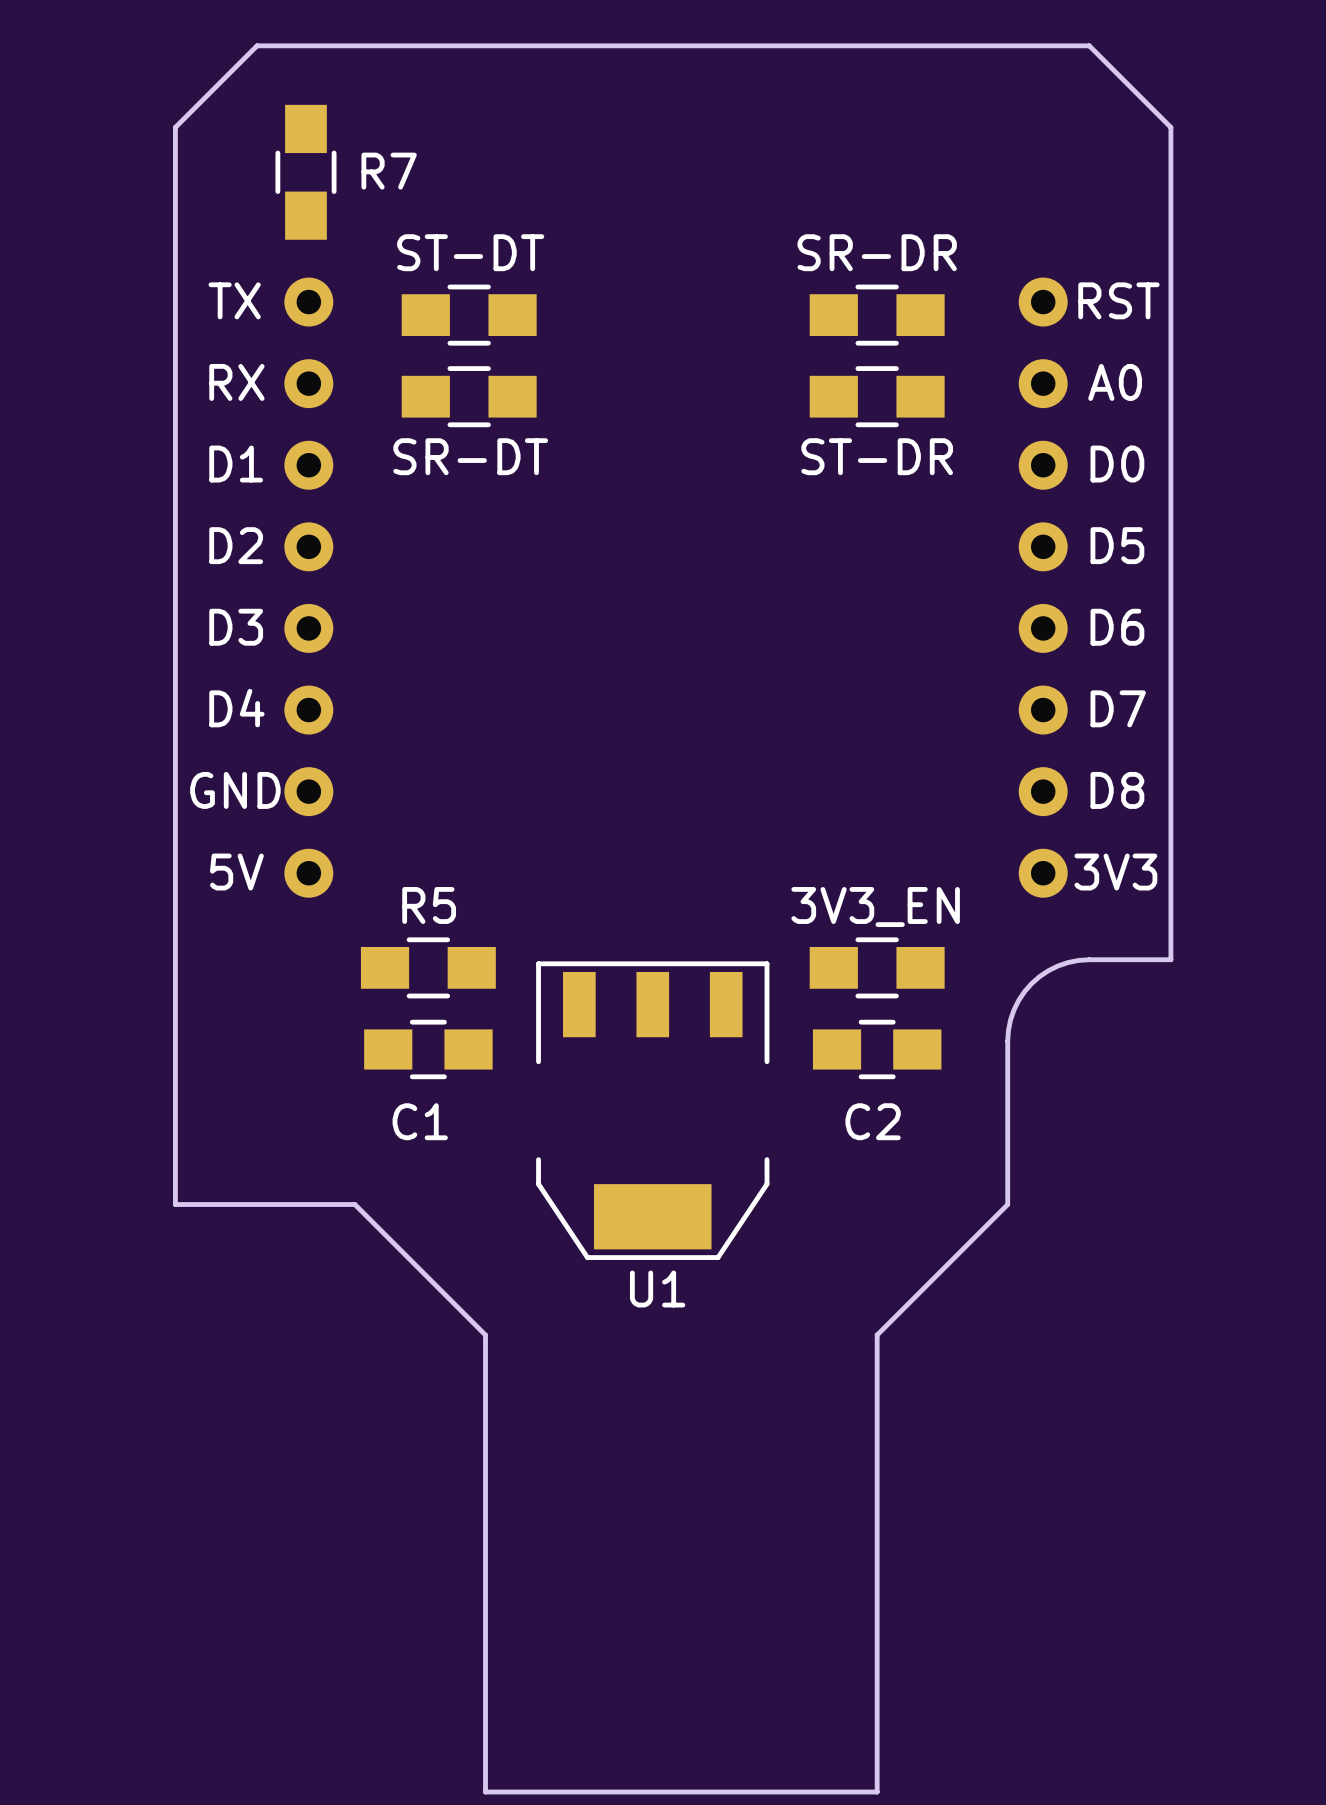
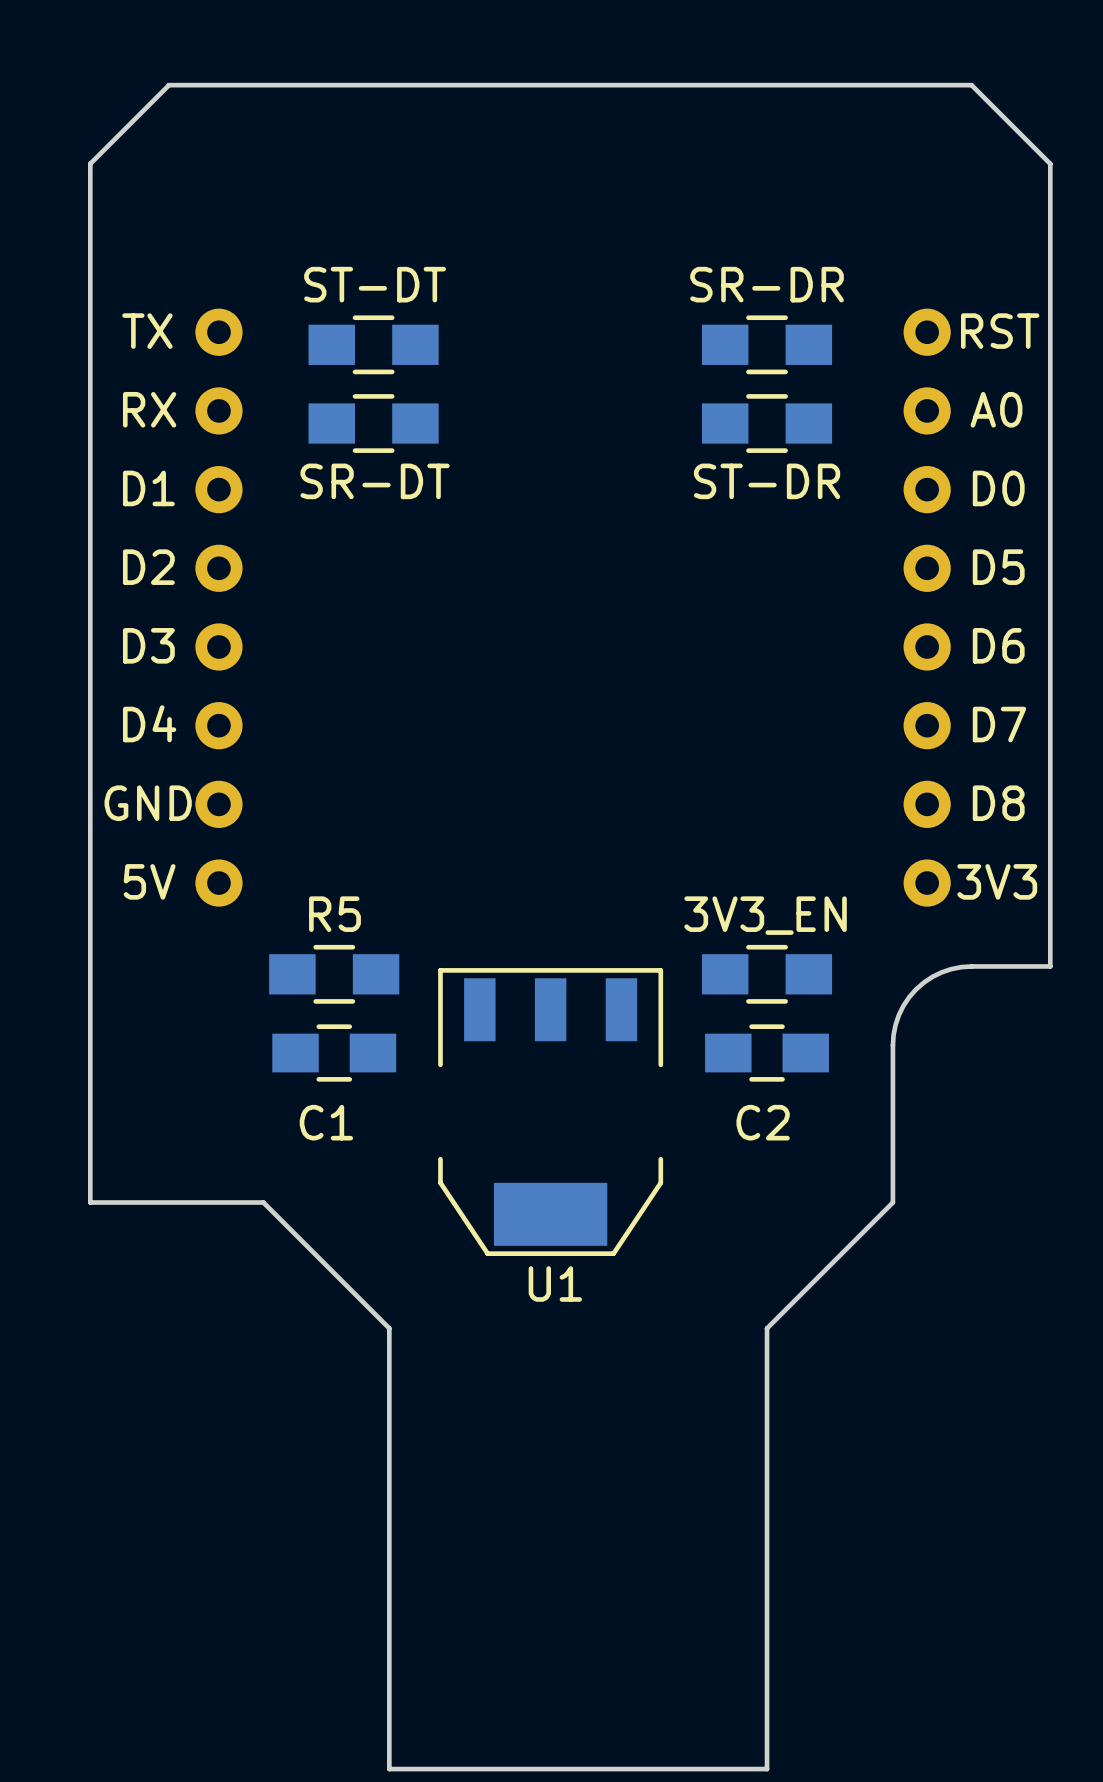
R7: (305, 172) -> none

